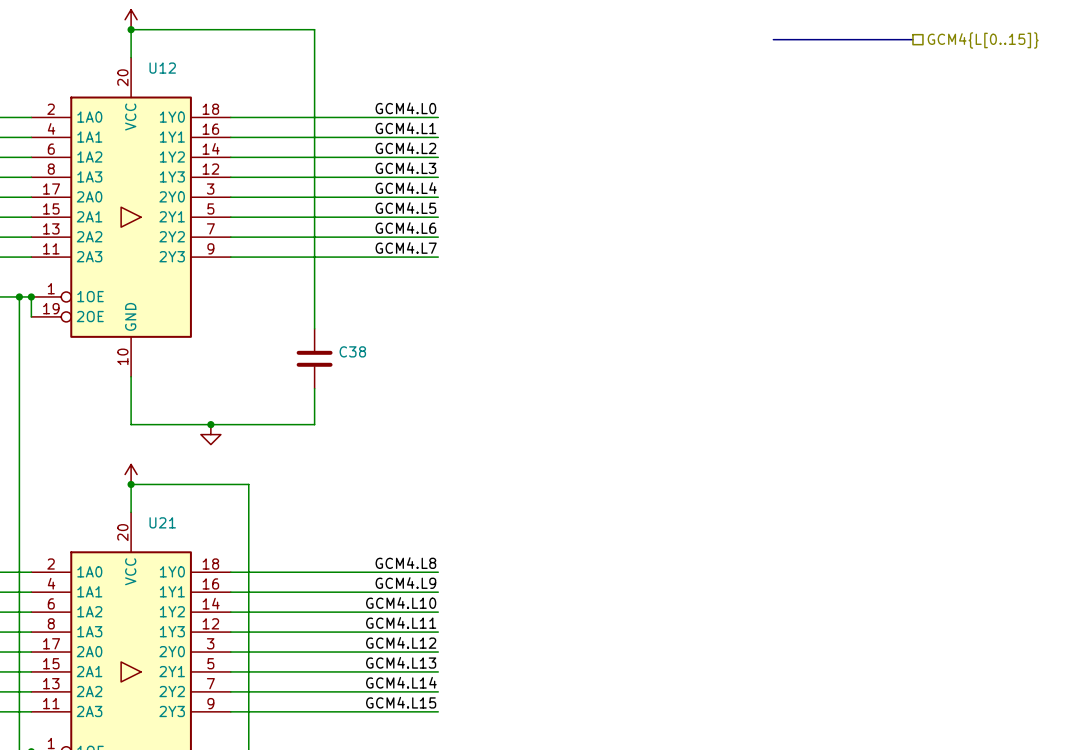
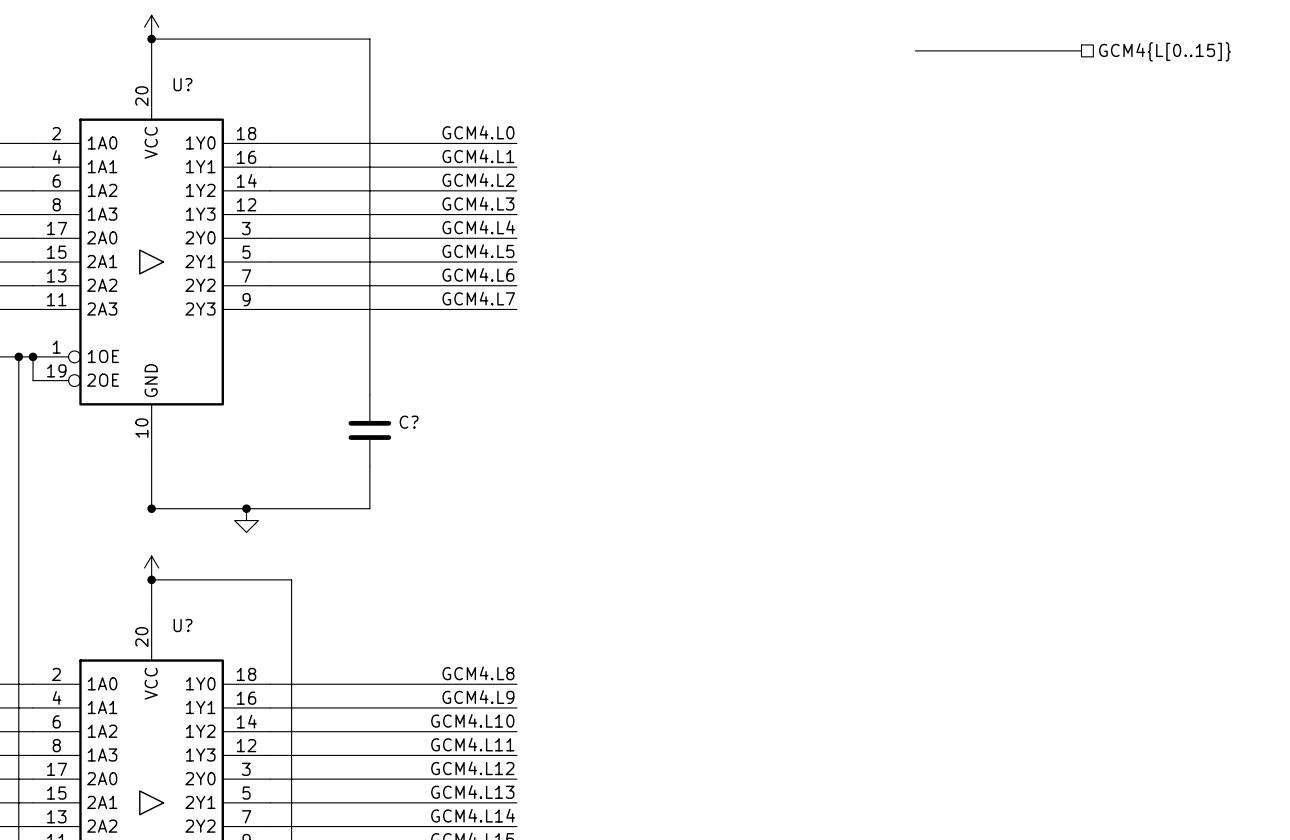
U12 name: U12 (162, 68) -> U? (183, 84)
C38 name: C38 (352, 351) -> C? (409, 422)
junction: none -> (151, 508)
U21 name: U21 (162, 522) -> U? (183, 625)

